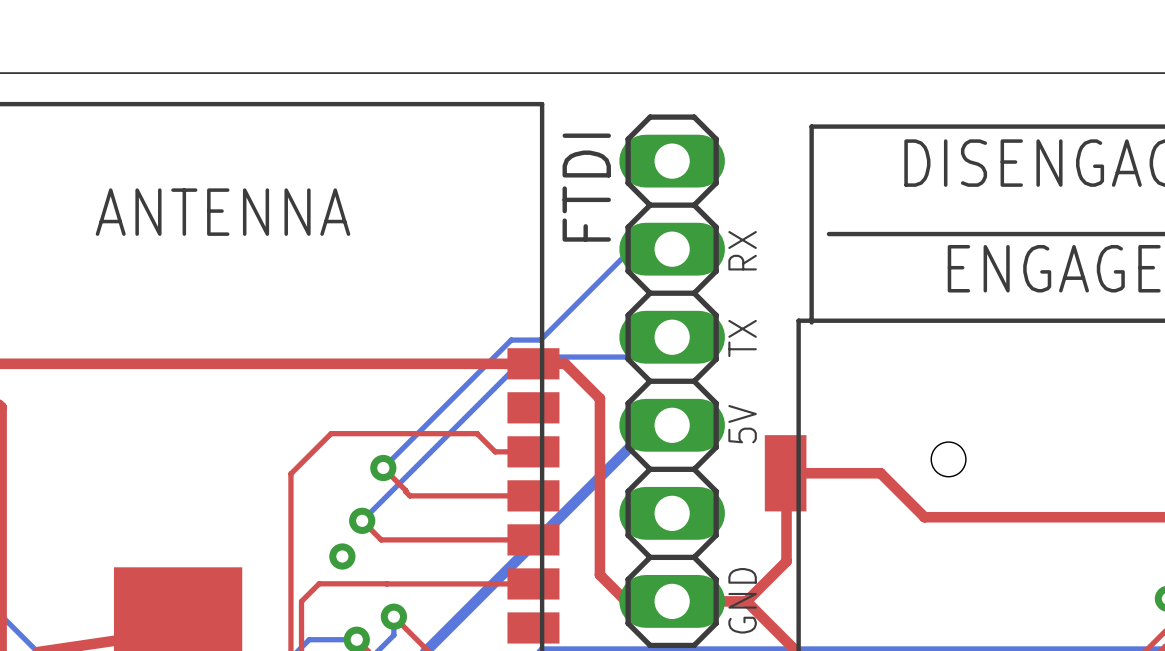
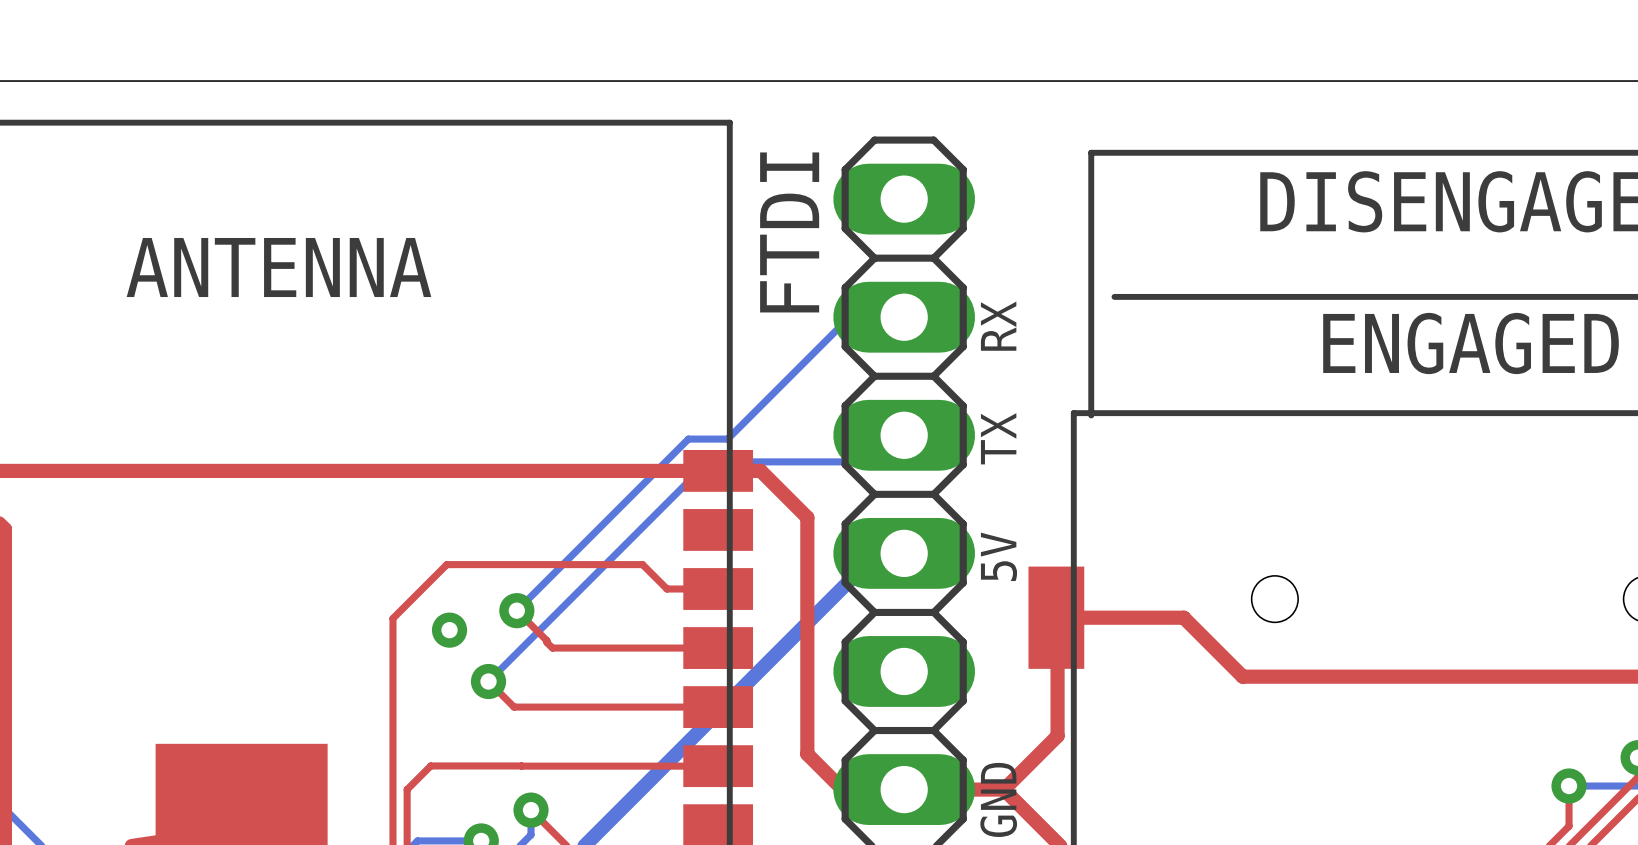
via position: (342, 556) -> (449, 630)

